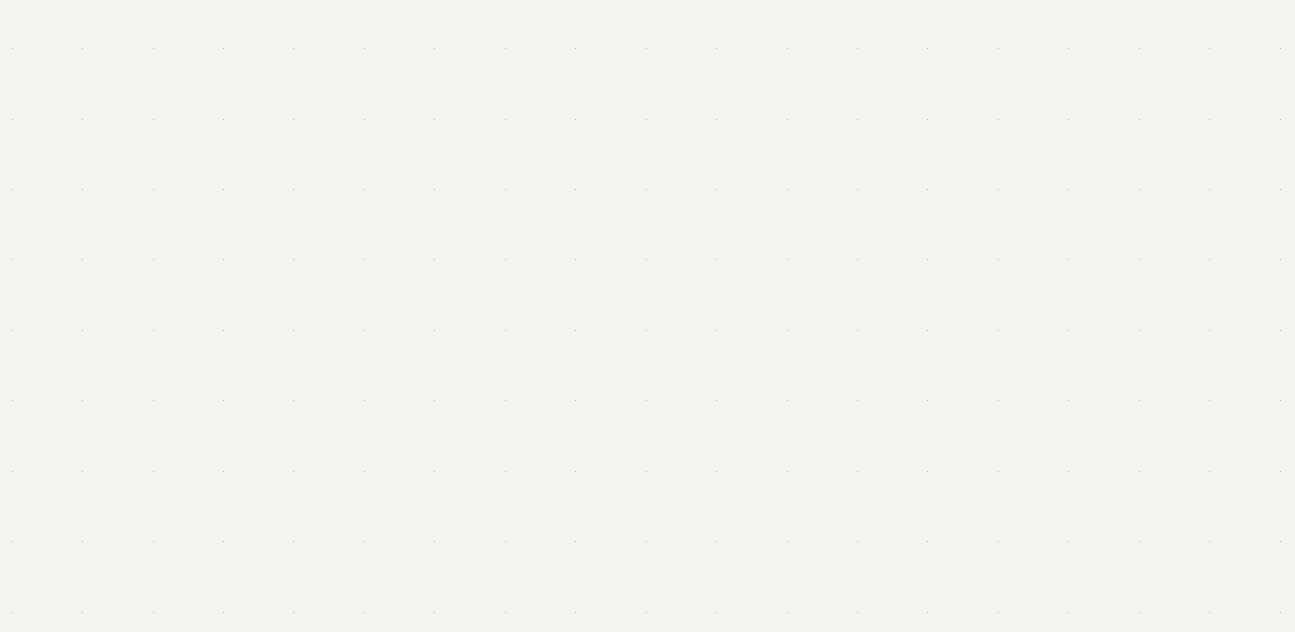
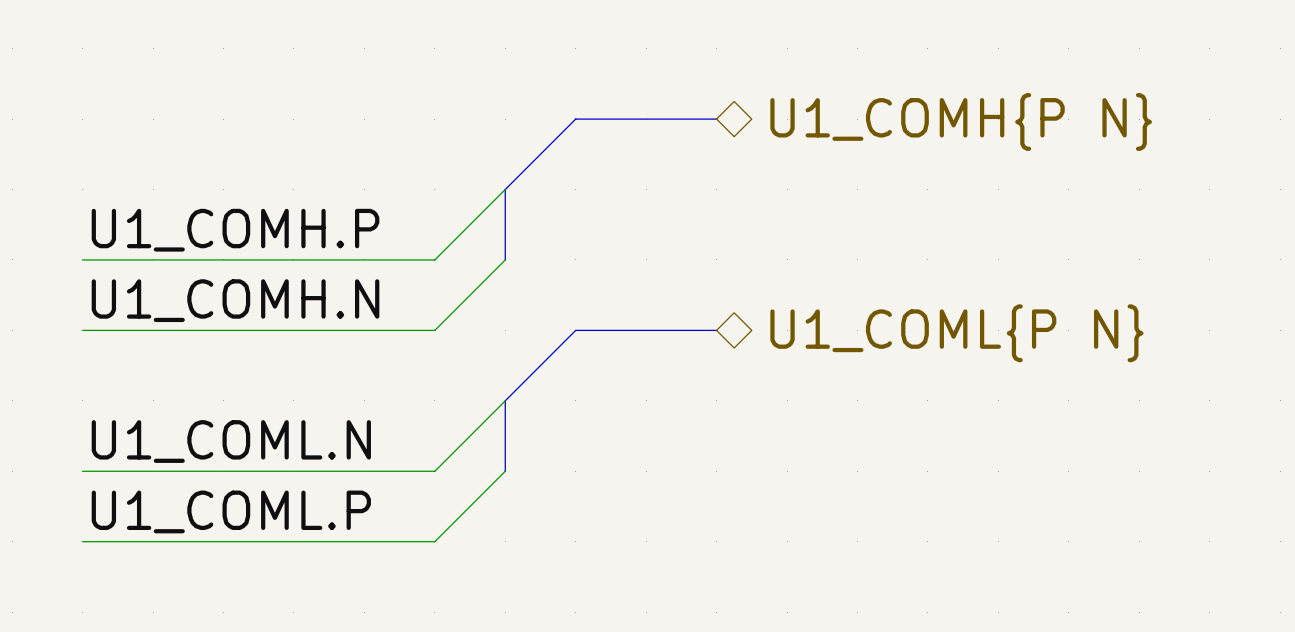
bus: none -> (716, 119) (575, 119) (505, 189) (505, 259)
hierarchical label: none -> U1_COMH{P N} (961, 121)
wire: none -> (505, 189) (434, 259) (82, 259)
label: none -> U1_COMH.P (235, 230)
wire: none -> (505, 259) (434, 330) (82, 330)
label: none -> U1_COMH.N (235, 300)
bus: none -> (716, 330) (575, 330) (505, 400) (505, 471)
hierarchical label: none -> U1_COML{P N} (956, 333)
wire: none -> (505, 400) (434, 471) (82, 471)
label: none -> U1_COML.N (231, 441)
wire: none -> (505, 471) (434, 541) (82, 541)
label: none -> U1_COML.P (231, 511)

